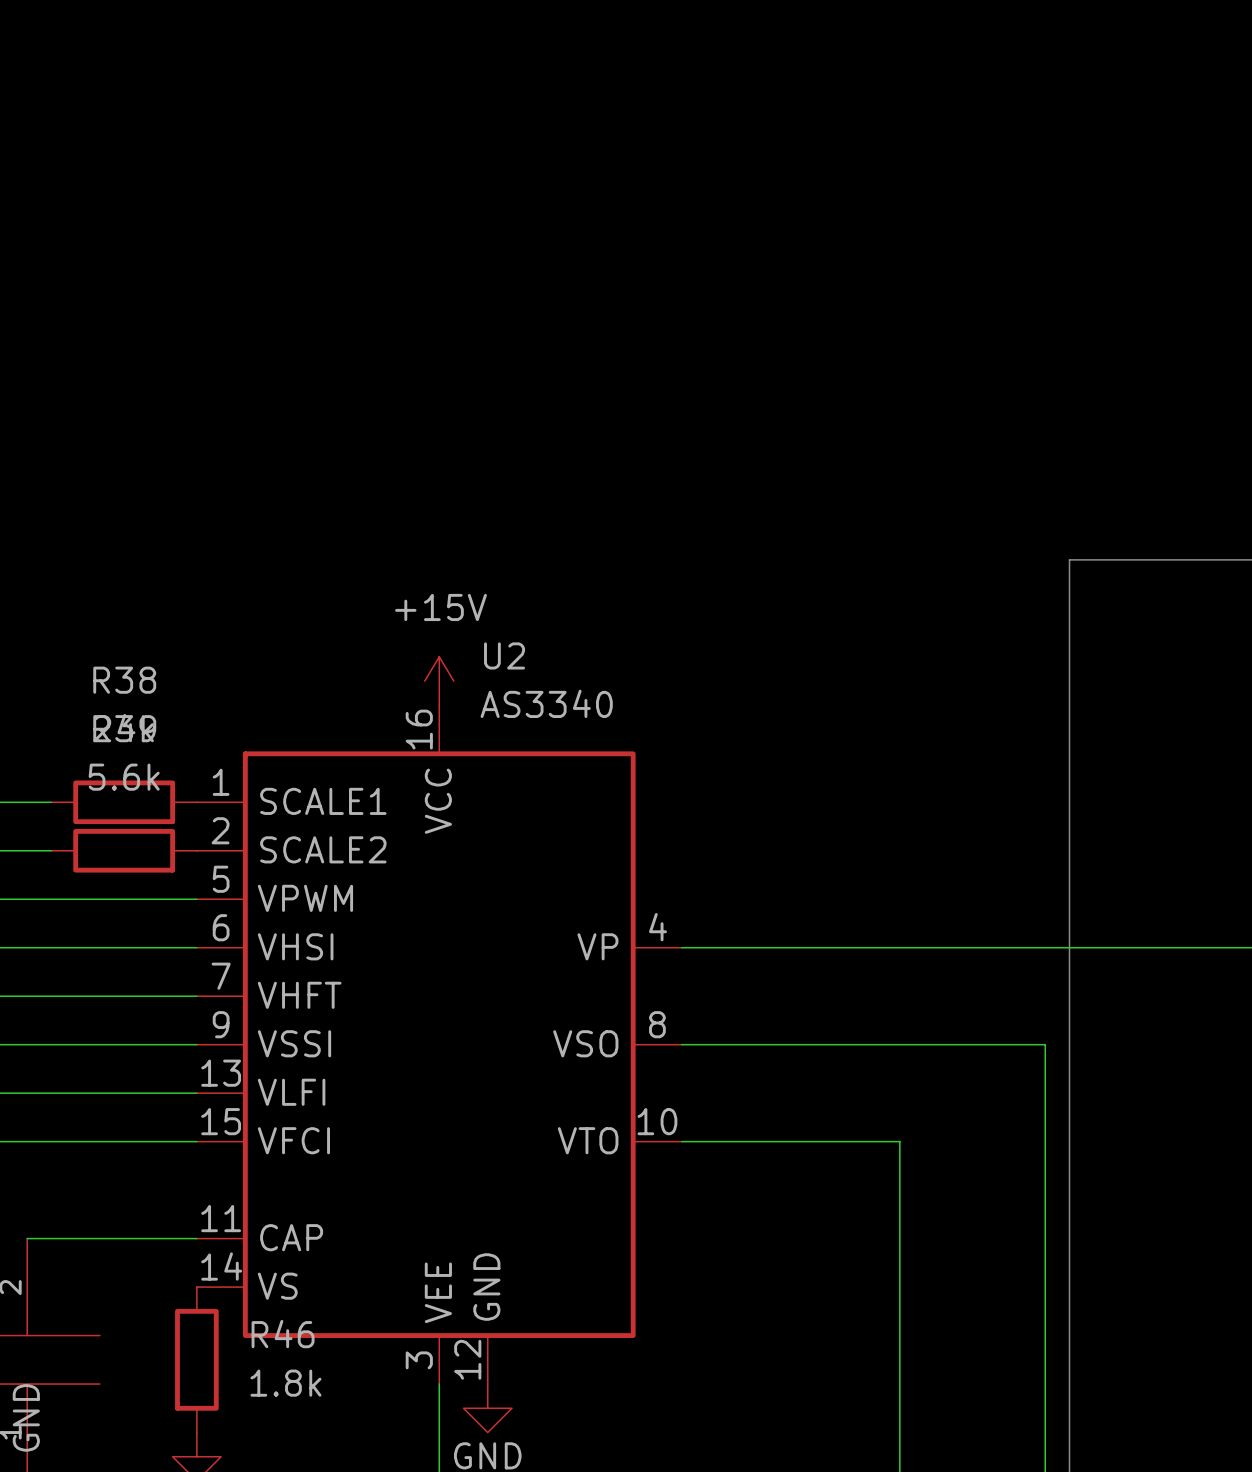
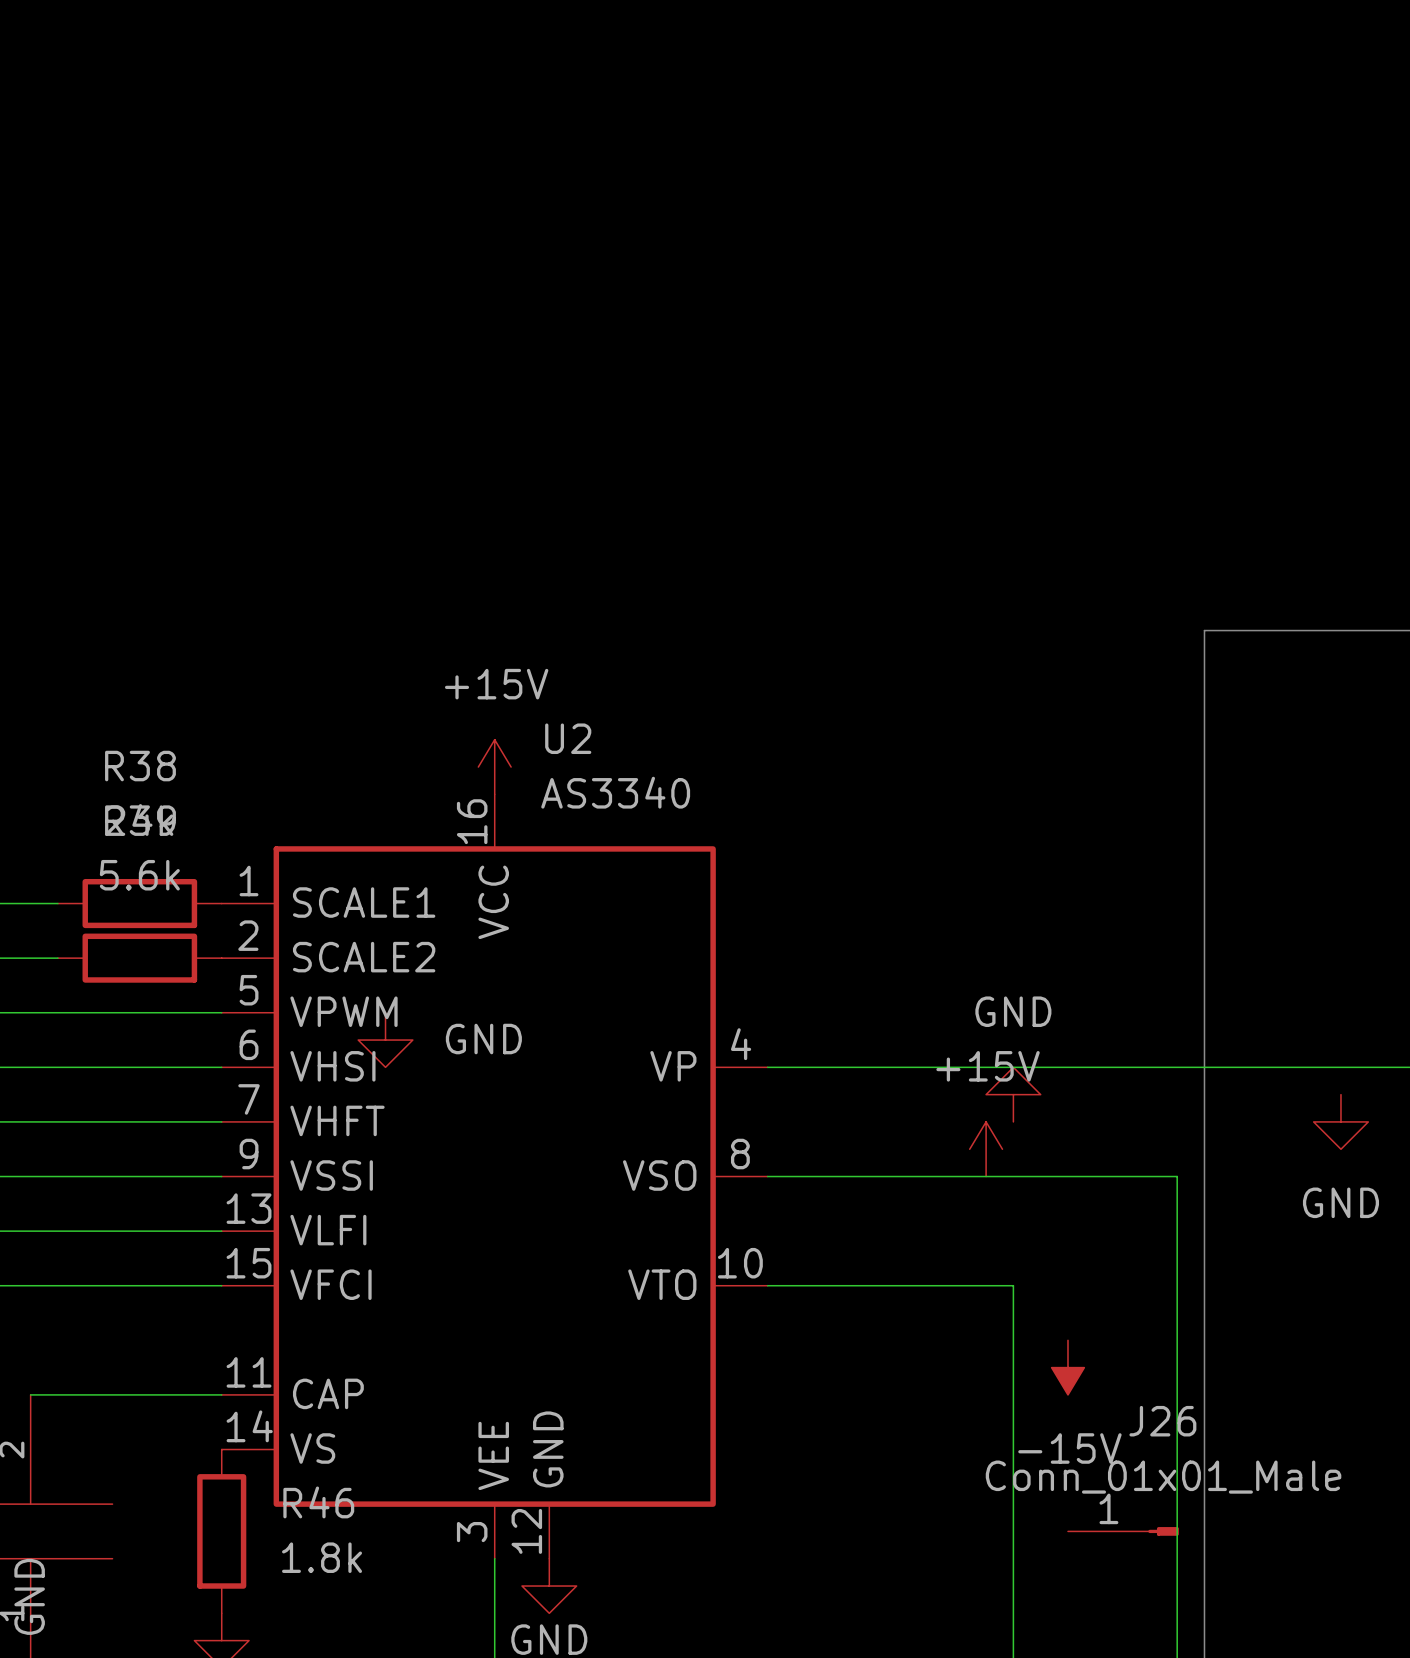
power symbol: none -> GND (385, 1040)
power symbol: none -> GND (1013, 1094)
power symbol: none -> GND (1340, 1121)
power symbol: none -> +15V (986, 1149)
power symbol: none -> -15V (1067, 1367)
J26: none -> Conn_01x01_Male (1123, 1531)

